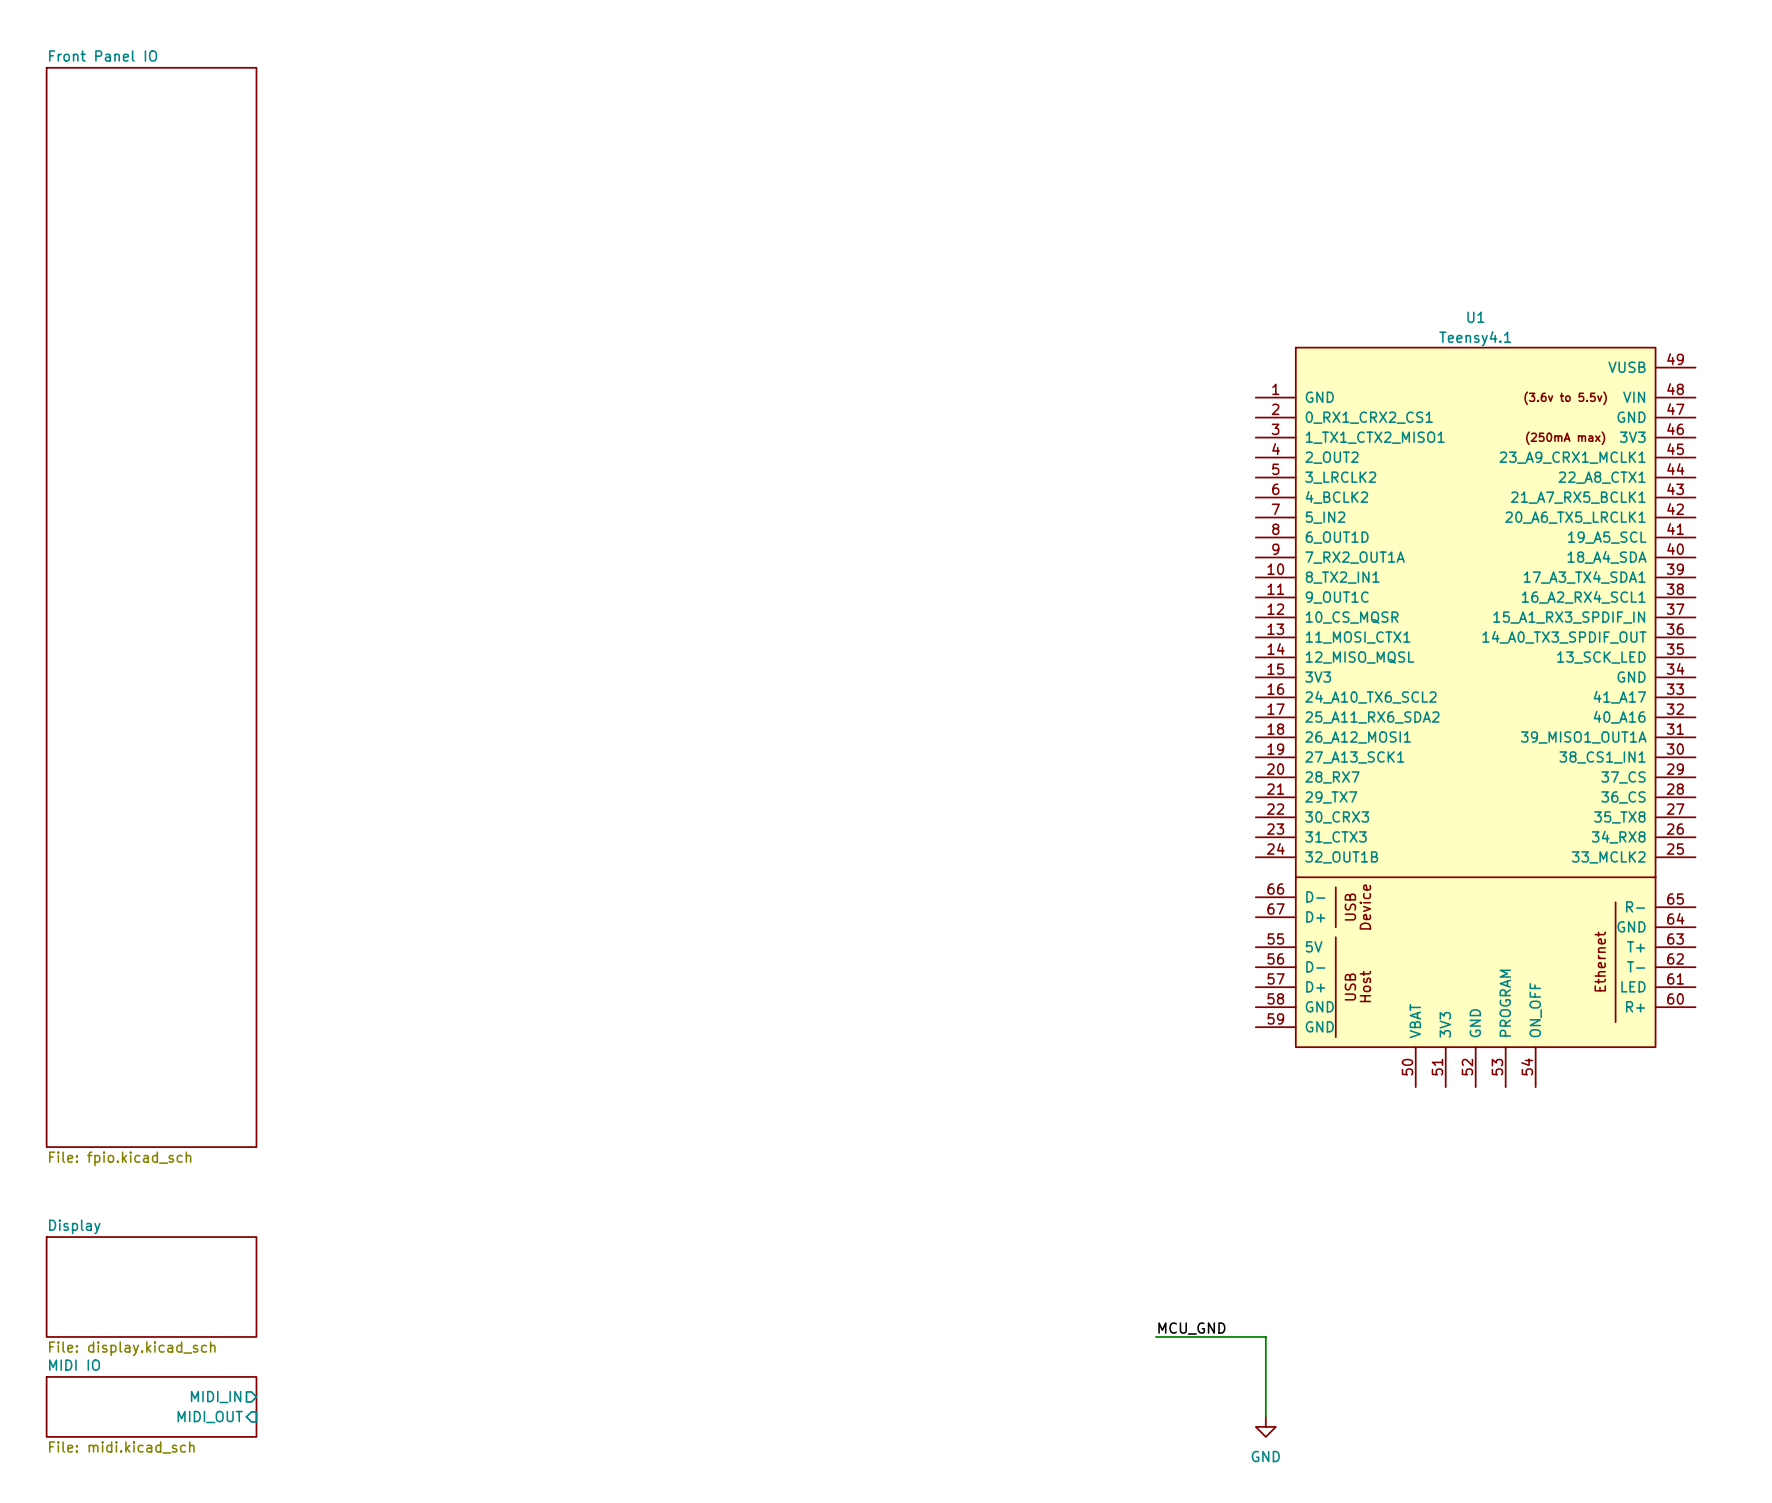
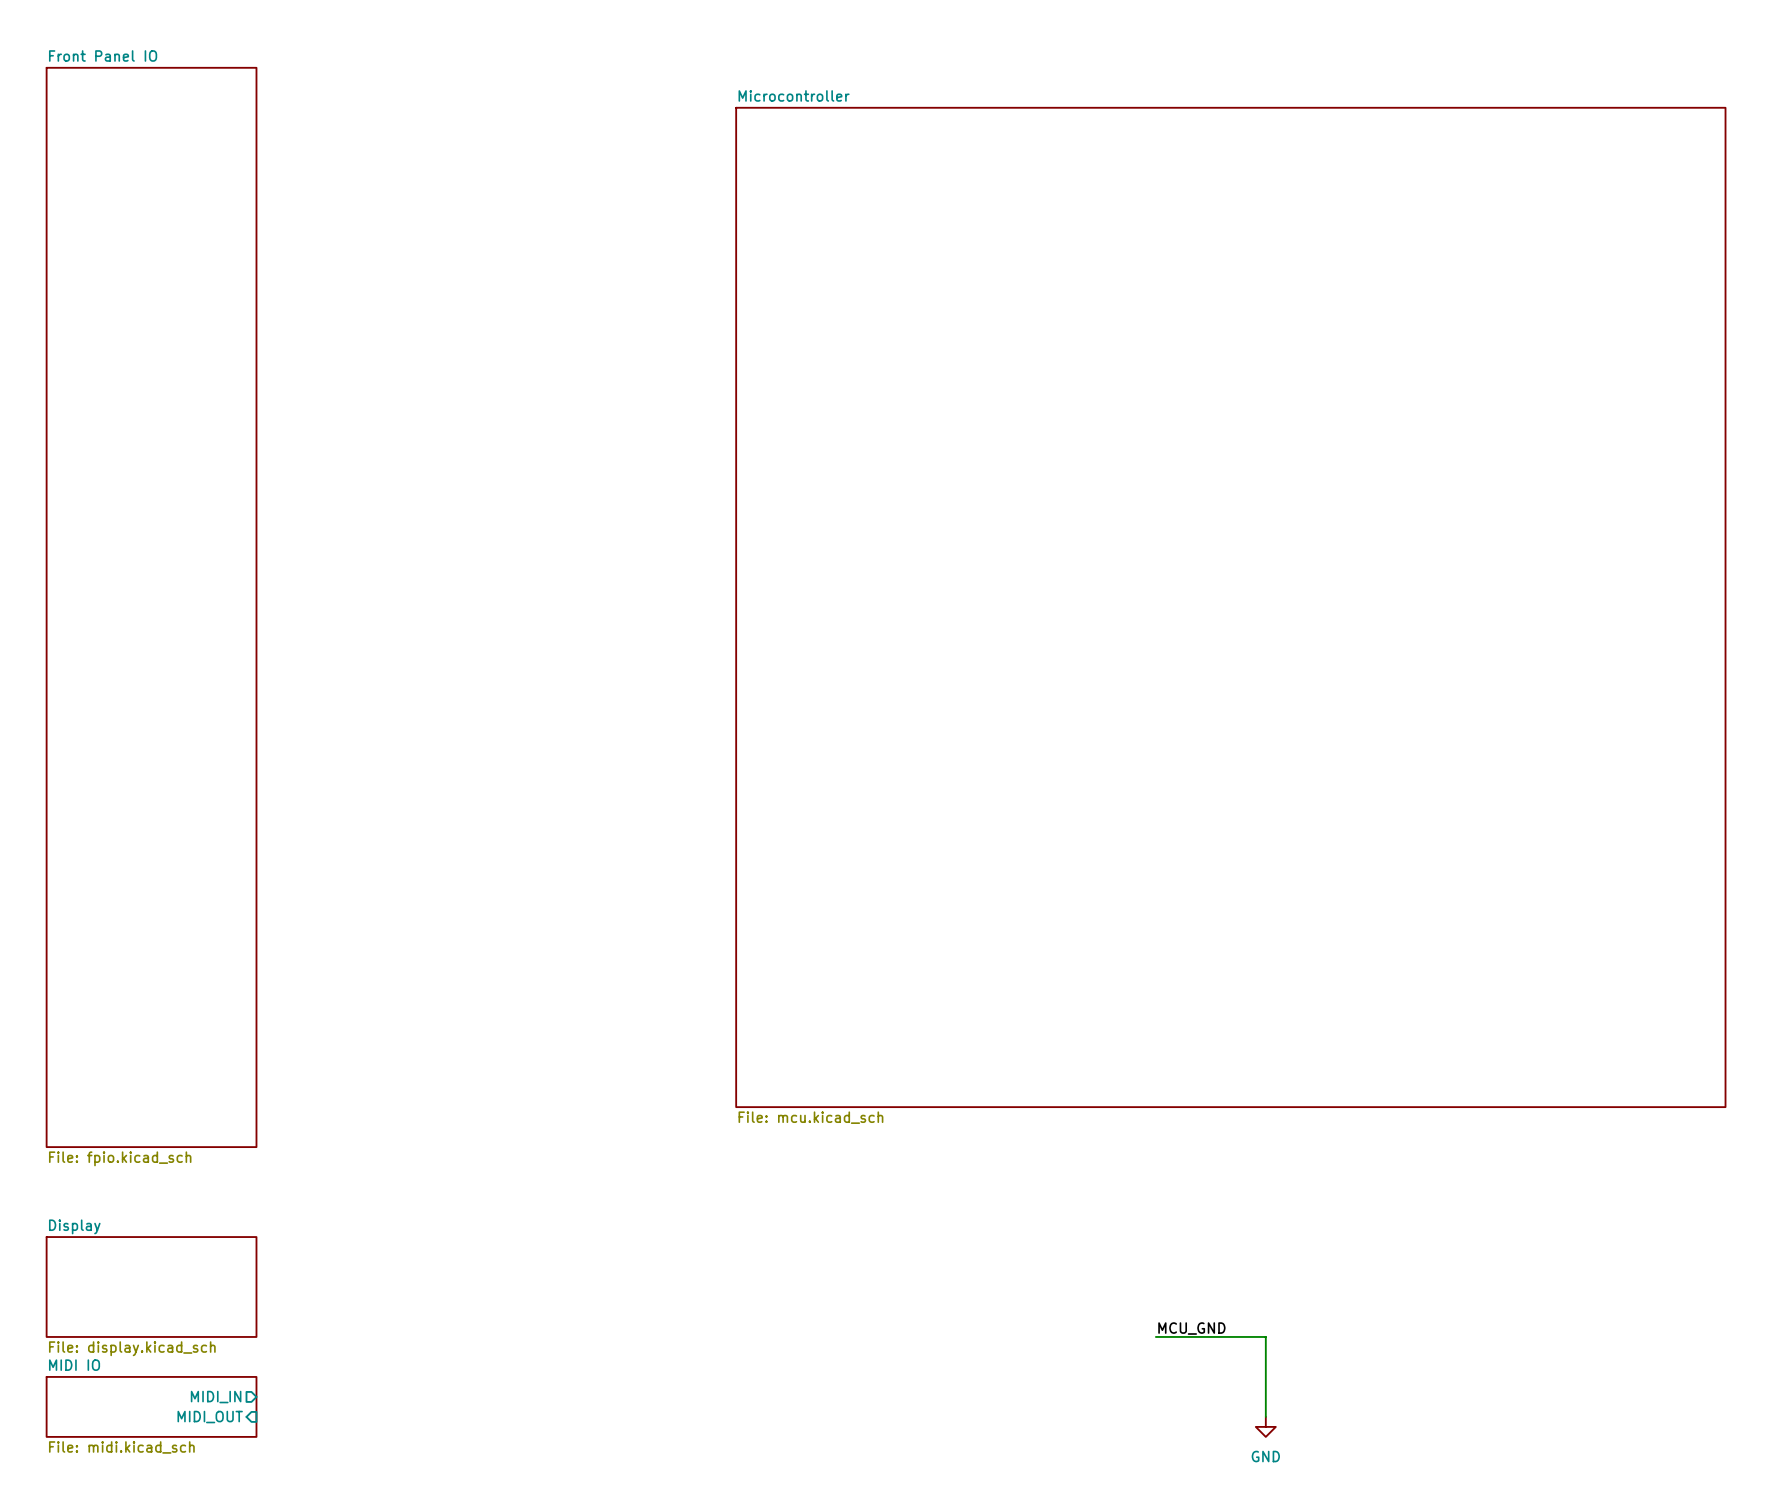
sheet Microcontroller: none -> File: mcu.kicad_sch (1230, 607)
U1: Teensy4.1 (1475, 717) -> none

